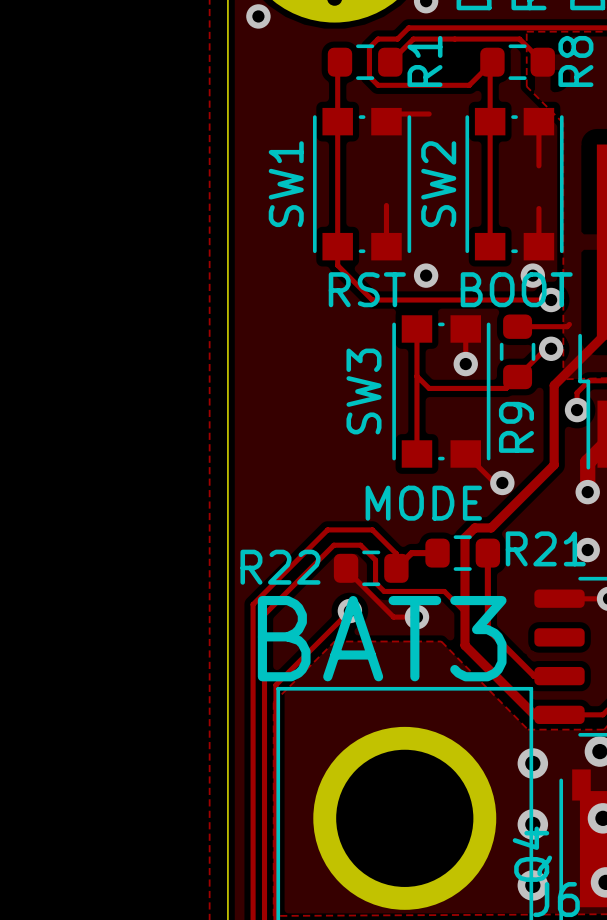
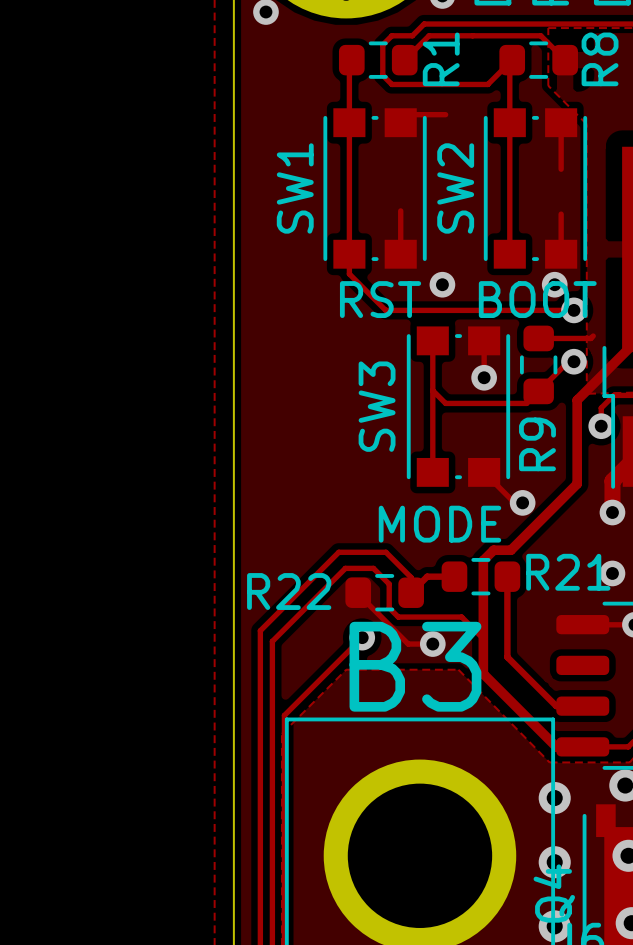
text: BAT3 (382, 638) -> B3 (415, 666)

